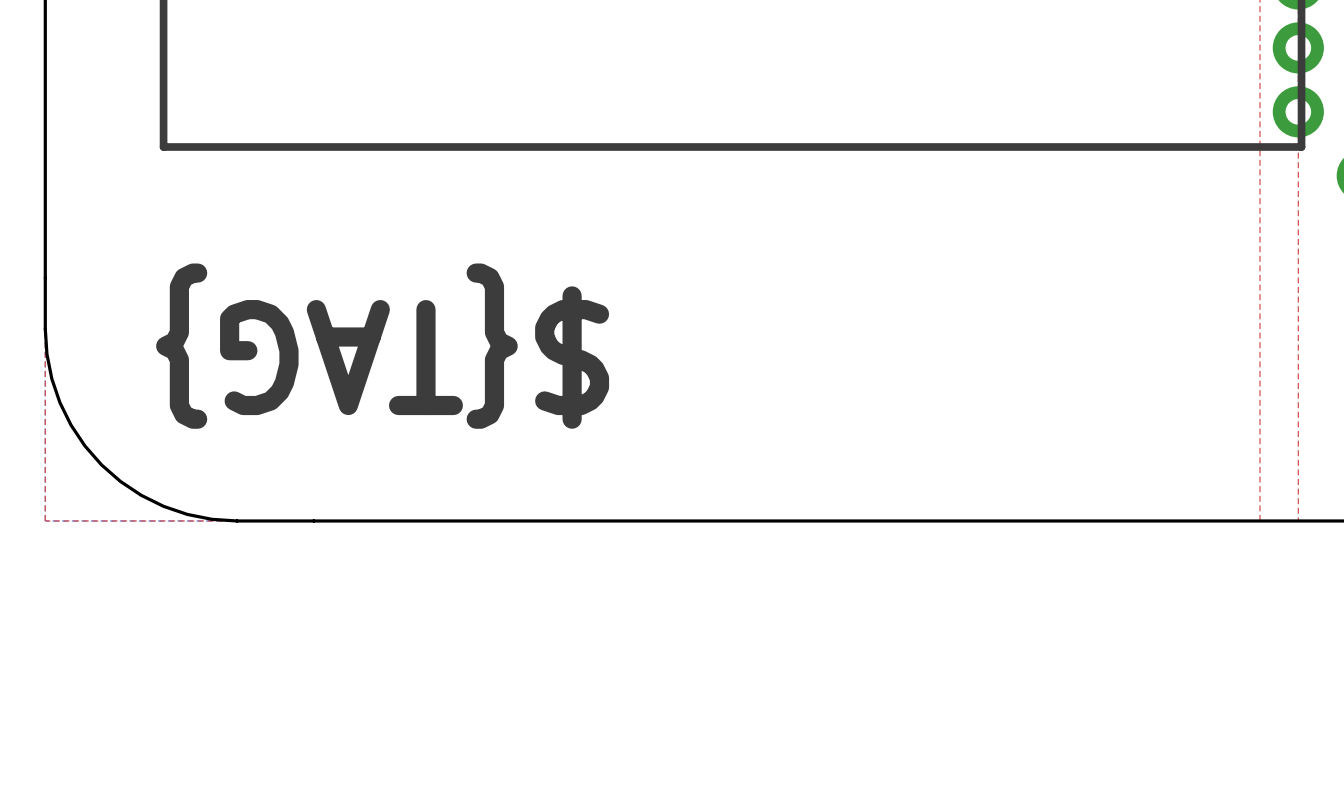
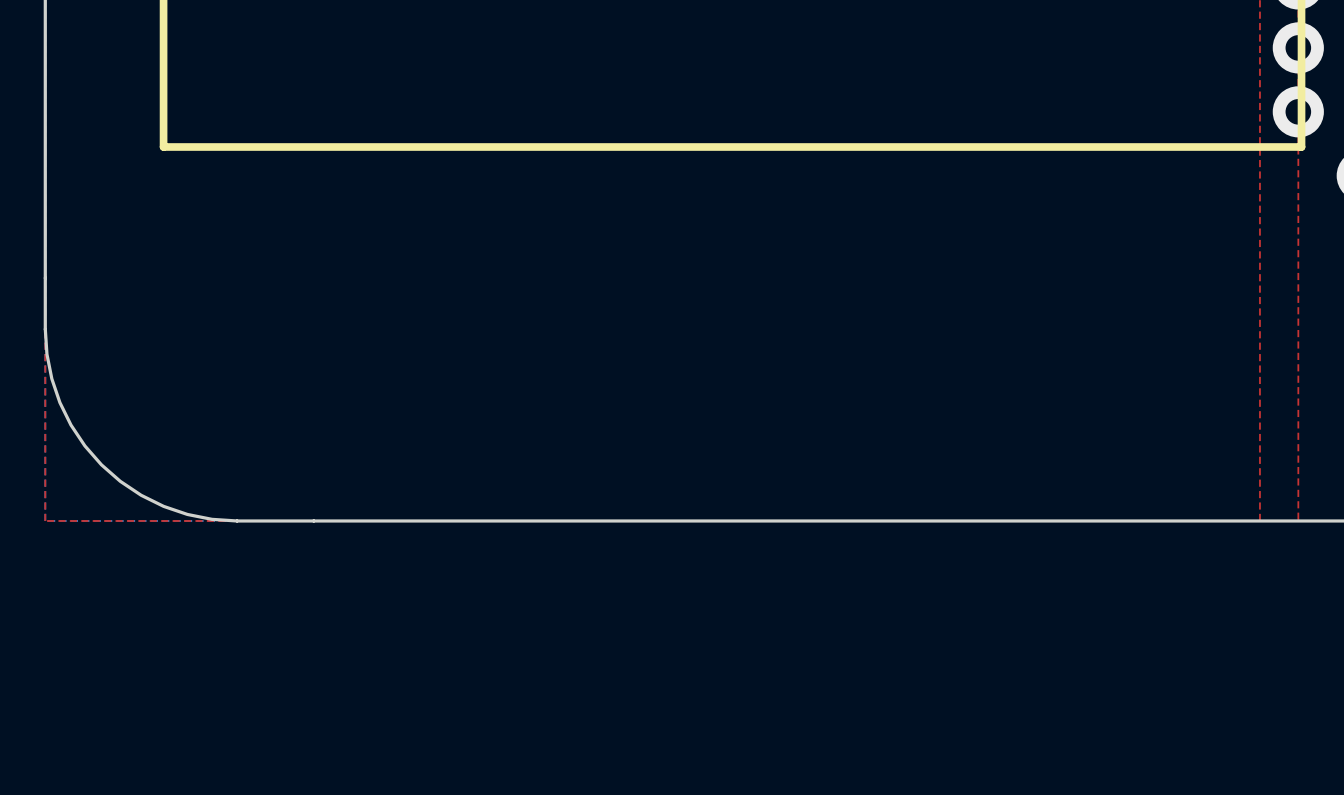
text: ${TAG} (382, 346) -> none

